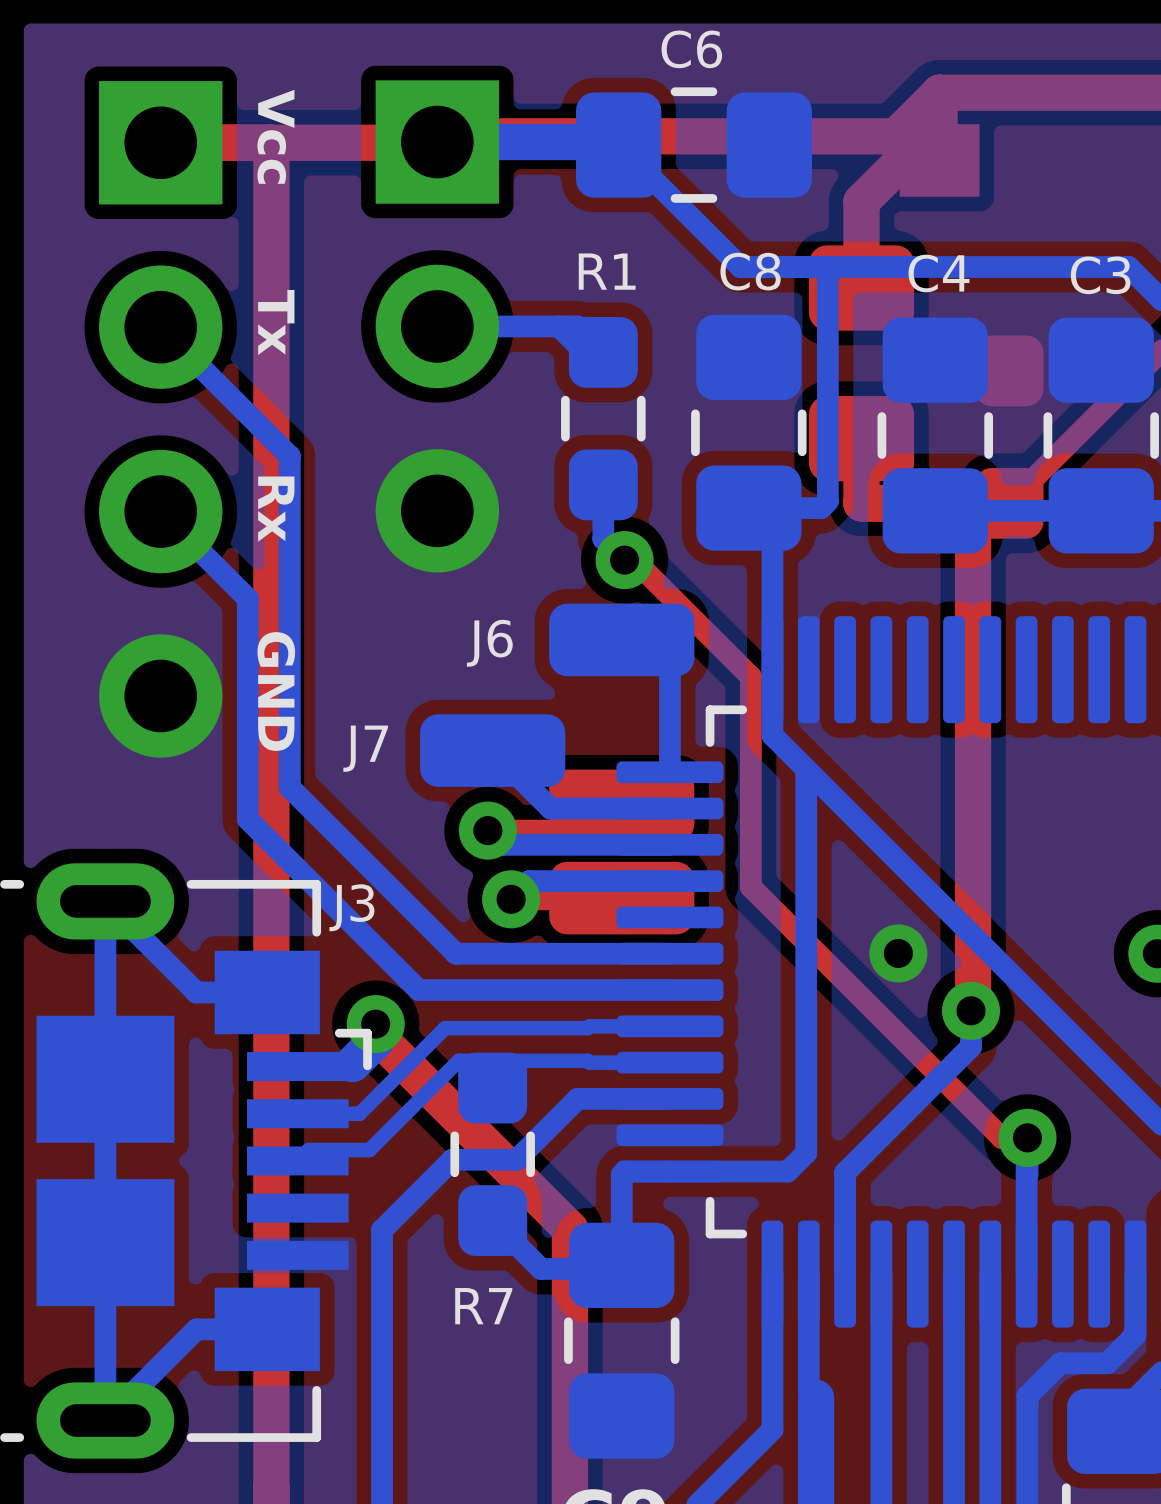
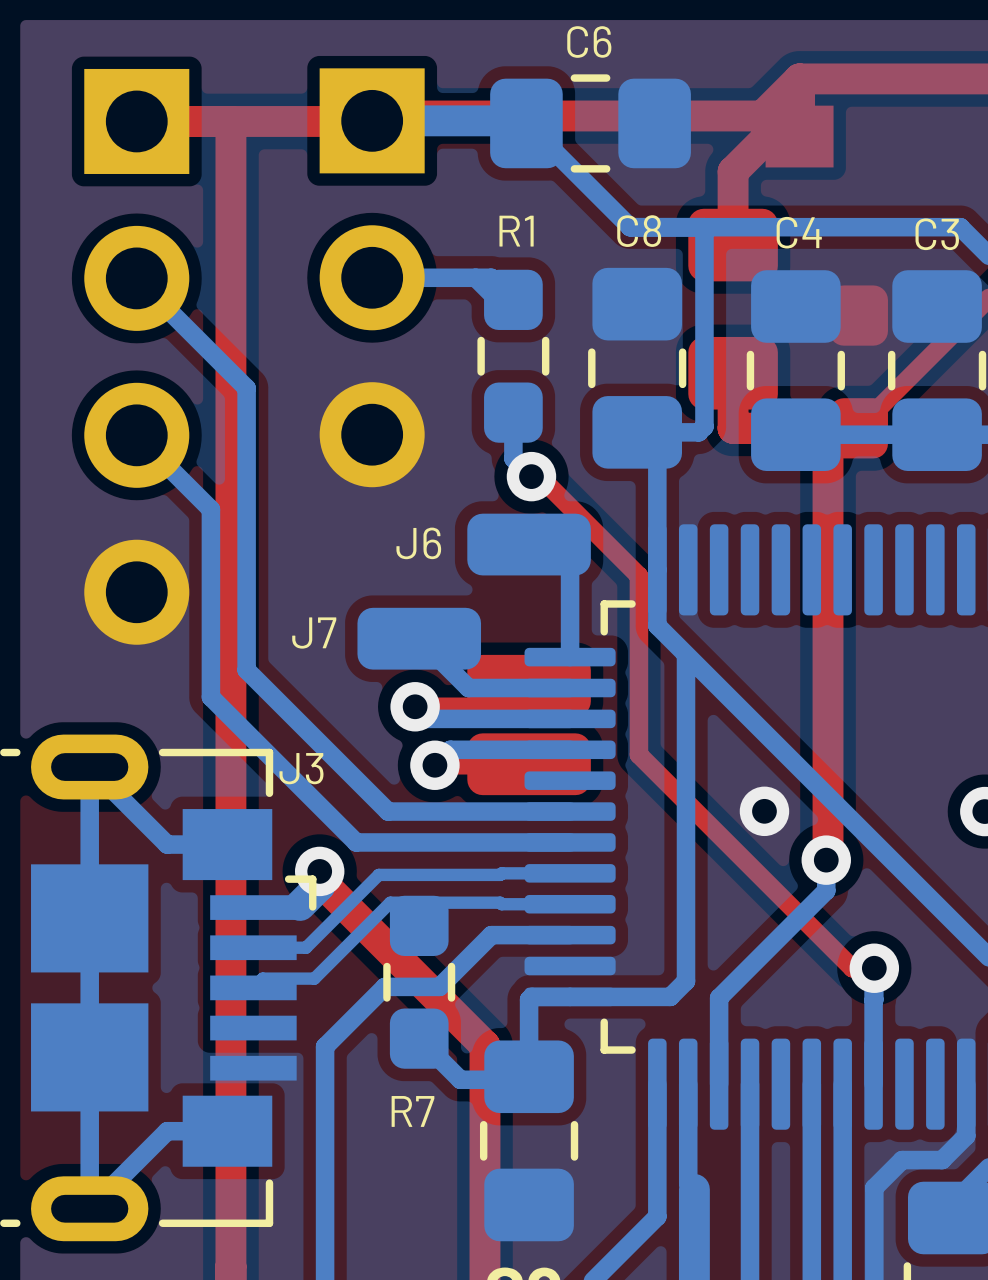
text: Vcc (275, 136) -> none
text: Tx (276, 322) -> none
text: Rx (276, 509) -> none
text: GND (276, 691) -> none

